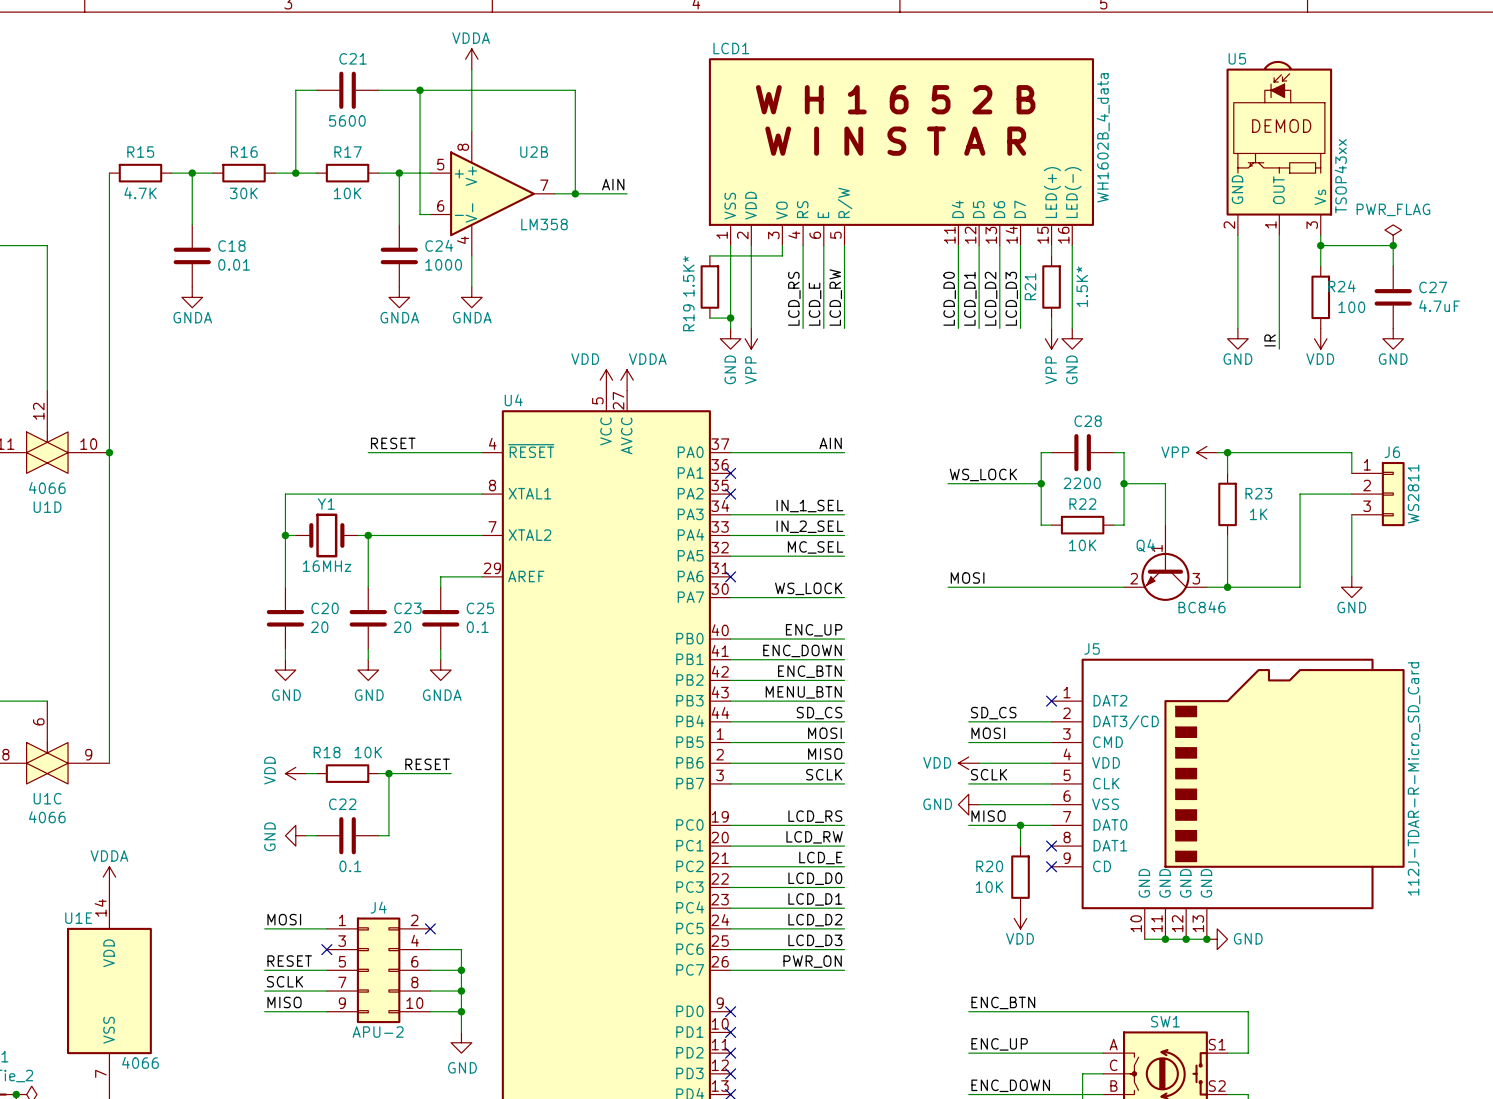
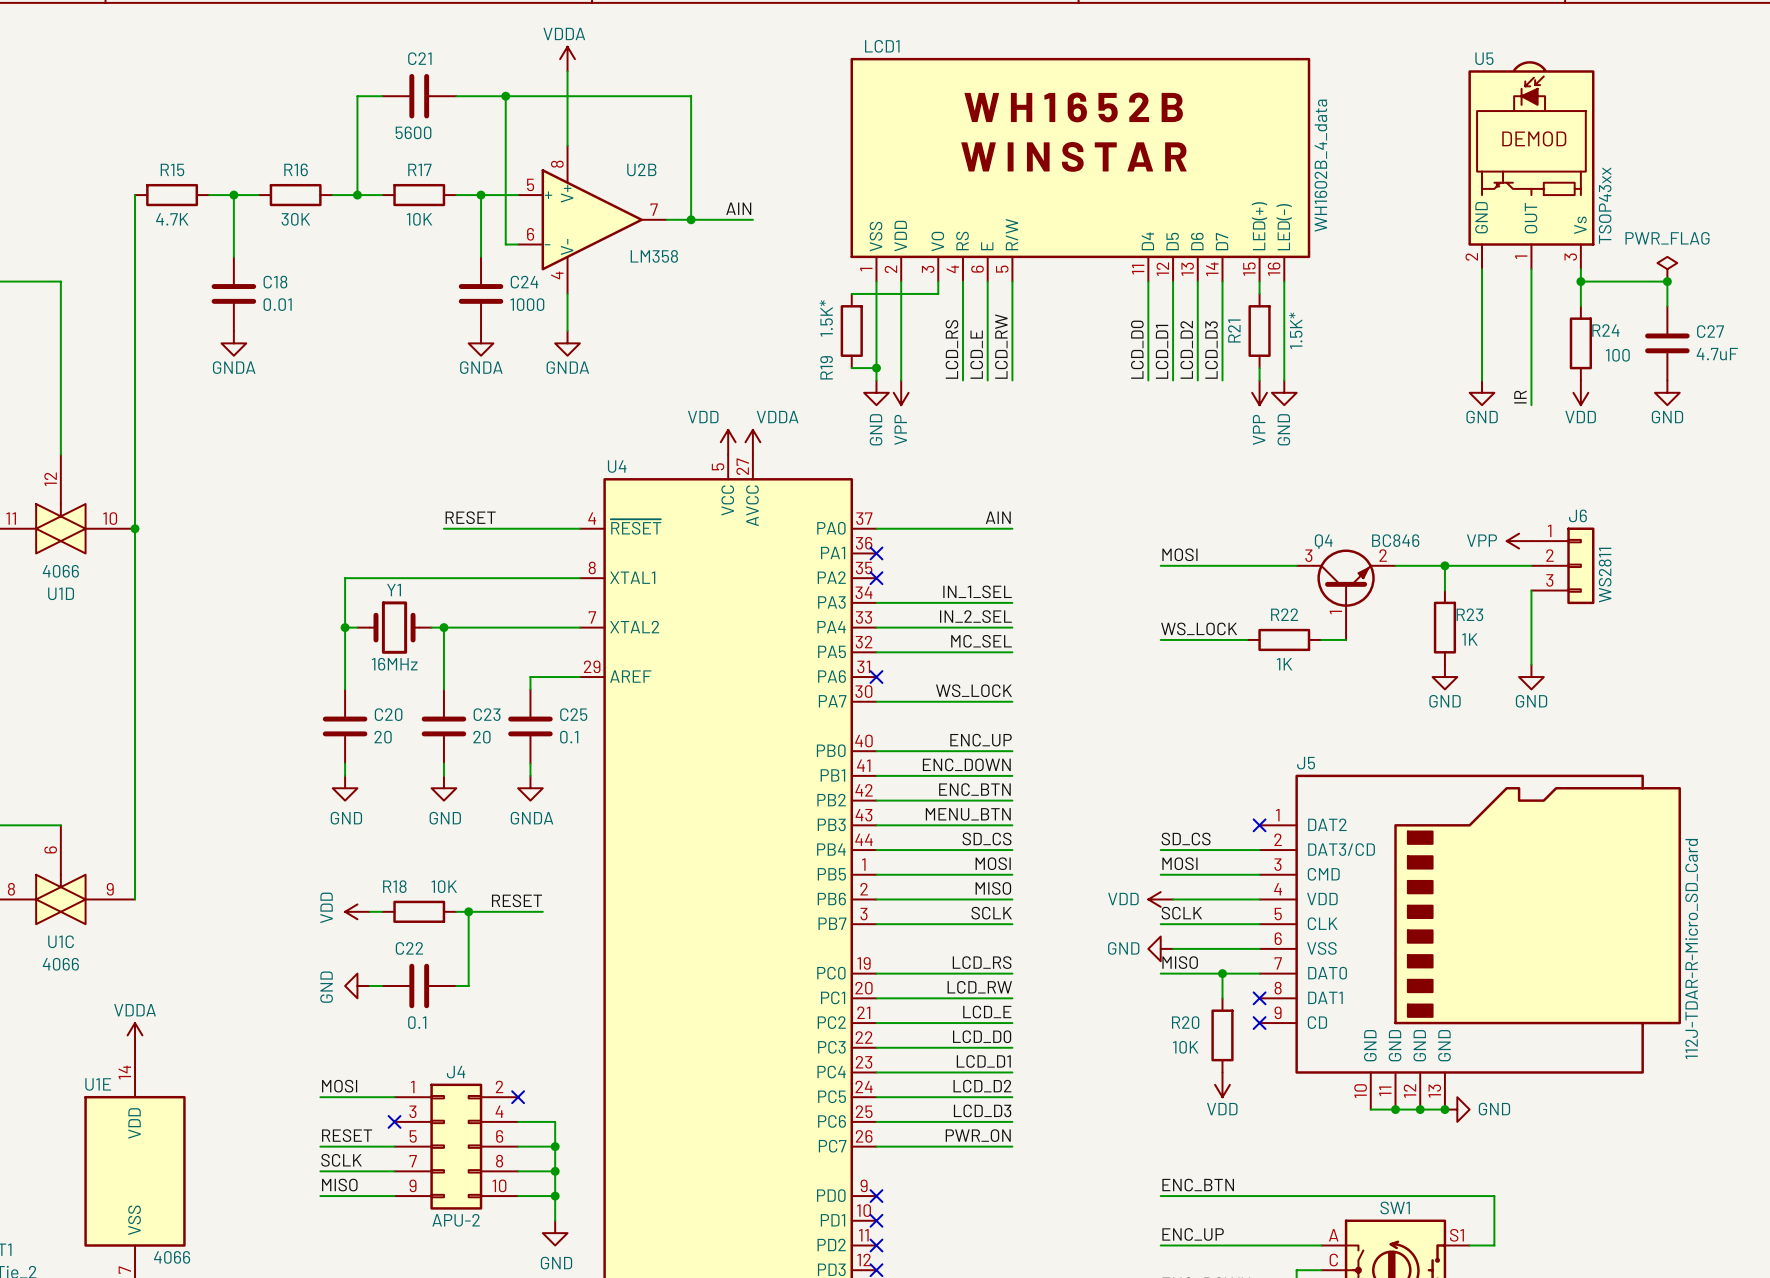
wire: (1051, 452) (1041, 452) (1041, 525) (1051, 525) -> none
C28: 2200 (1082, 452) -> none
wire: (1113, 452) (1124, 452) (1124, 525) (1113, 525) -> none
power symbol position: VPP (1206, 452) -> VPP (1519, 541)
wire: (1217, 452) (1351, 452) (1351, 473) -> none
wire: (1227, 452) (1227, 473) -> (1444, 565) (1444, 590)
junction position: (1227, 452) -> (1444, 565)
label position: WS_LOCK (983, 474) -> WS_LOCK (1199, 628)
wire: (948, 483) (968, 483) -> (1321, 639) (1346, 639)
wire: none -> (1247, 565) (1296, 565)
junction: (1041, 483) -> none
wire: (1124, 483) (1165, 483) (1165, 525) -> none
junction: (1124, 483) -> none
wire: none -> (1395, 565) (1531, 565)
R23 name position: R23 (1258, 493) -> R23 (1469, 614)
wire: (1351, 494) (1300, 494) (1300, 587) (1206, 587) -> none
J6 position: (1378, 494) -> (1562, 565)
R23 position: (1227, 504) -> (1444, 627)
R23 value position: 1K (1258, 514) -> 1K (1469, 639)
wire: (1351, 514) (1351, 576) -> (1531, 590) (1531, 664)
R22 position: (1082, 525) -> (1284, 639)
wire: (1227, 535) (1227, 587) -> none
wire: none -> (1160, 639) (1247, 639)
R22 value: 10K (1082, 545) -> 1K (1284, 664)
Q4 name position: Q4 (1145, 545) -> Q4 (1323, 541)
Q4 position: (1165, 563) -> (1346, 594)
Q4 rotation: 0° (1165, 576) -> 180° (1346, 578)
power symbol: none -> GND (1444, 677)
power symbol: none -> GND (1531, 677)
label position: MOSI (967, 578) -> MOSI (1179, 554)
wire: (948, 587) (1124, 587) -> none
junction: (1227, 587) -> none
power symbol: GND (1351, 587) -> none
Q4 value position: BC846 (1202, 607) -> BC846 (1395, 540)

